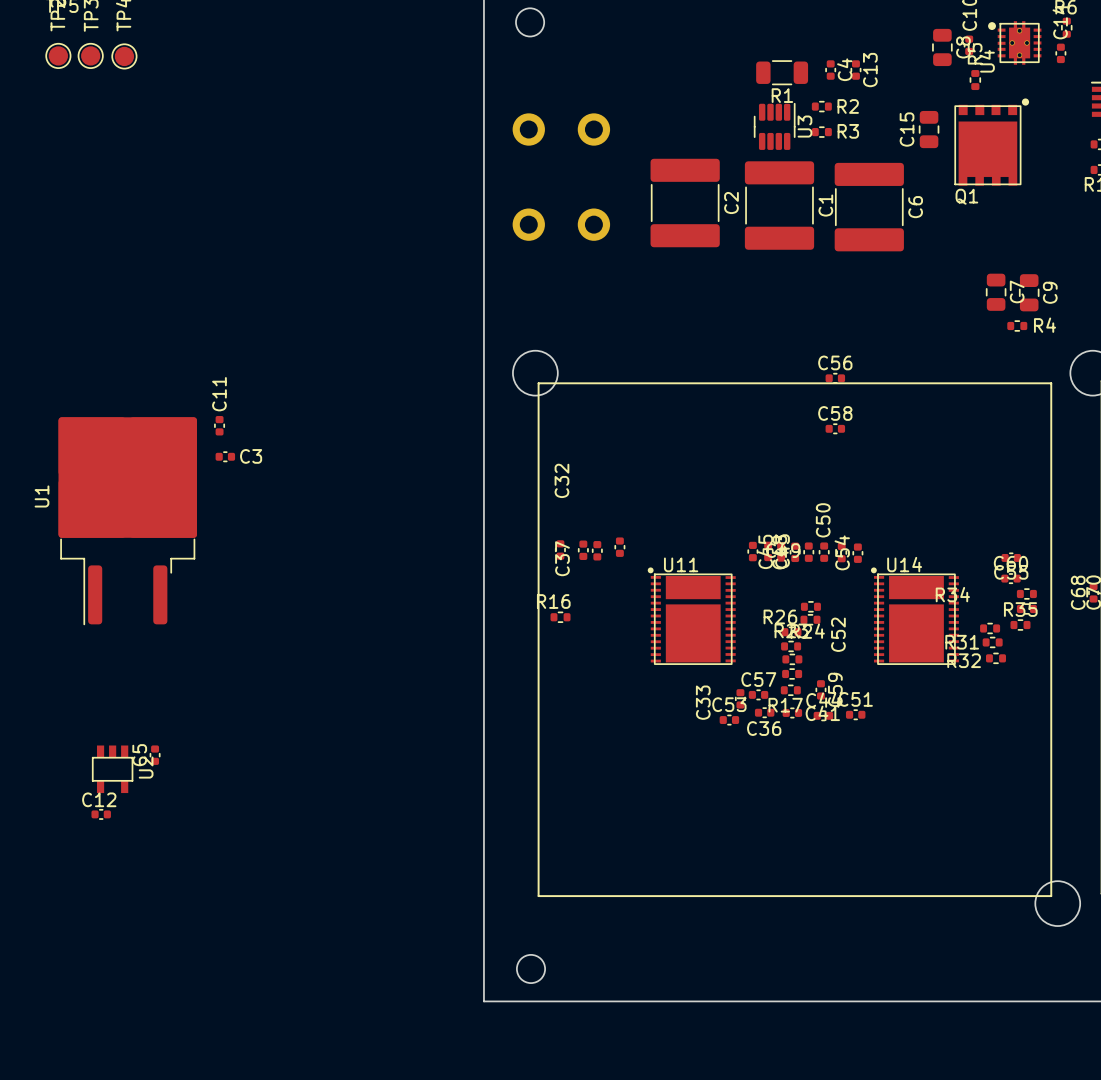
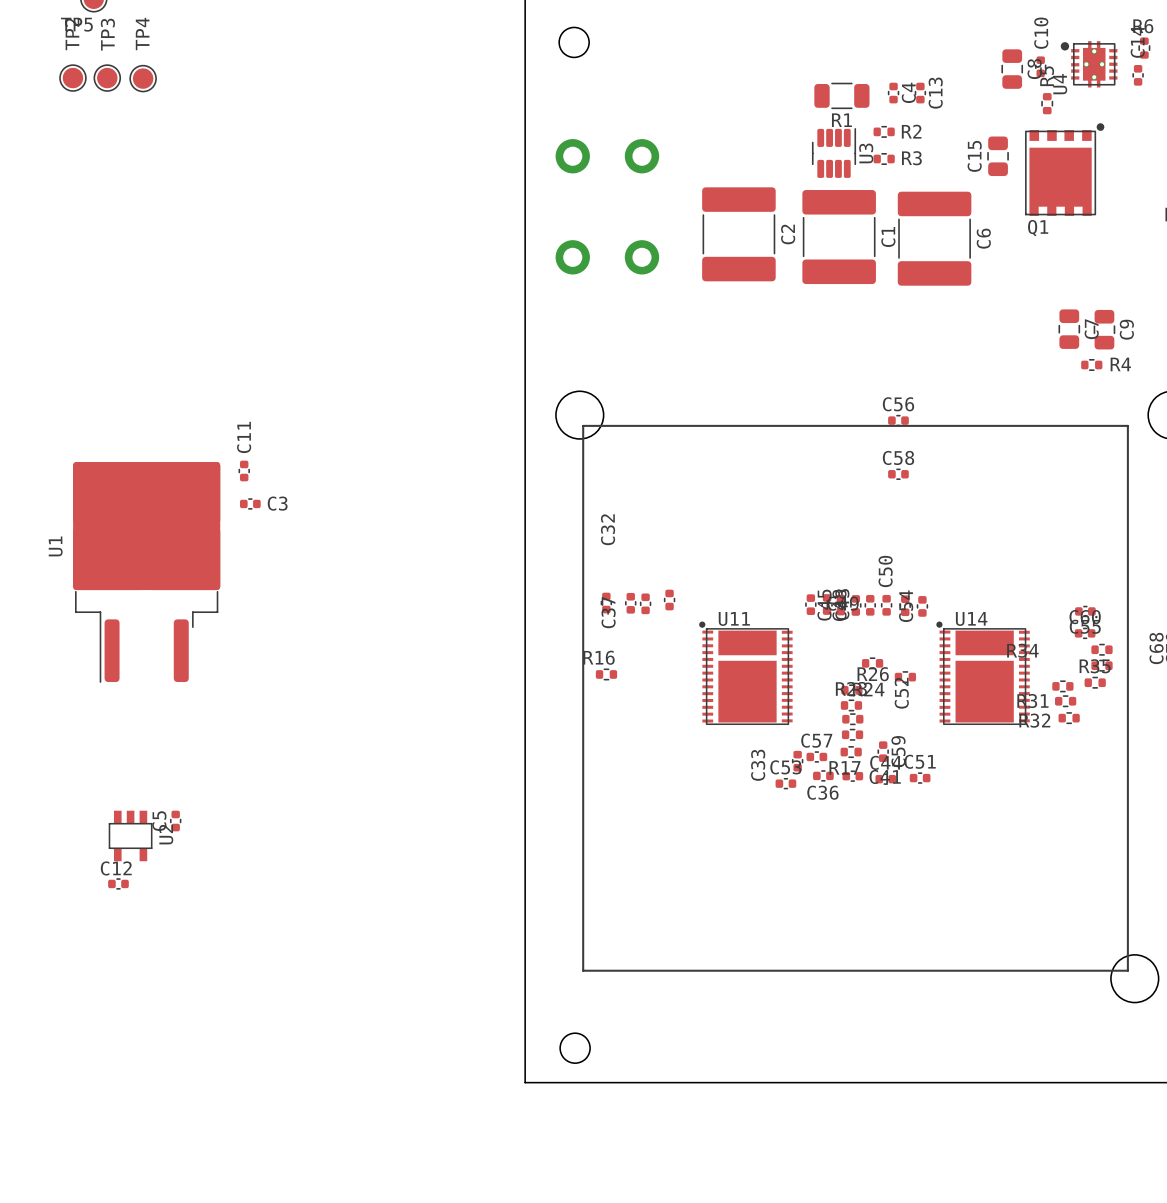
R26 position: (810, 619) -> (905, 677)

